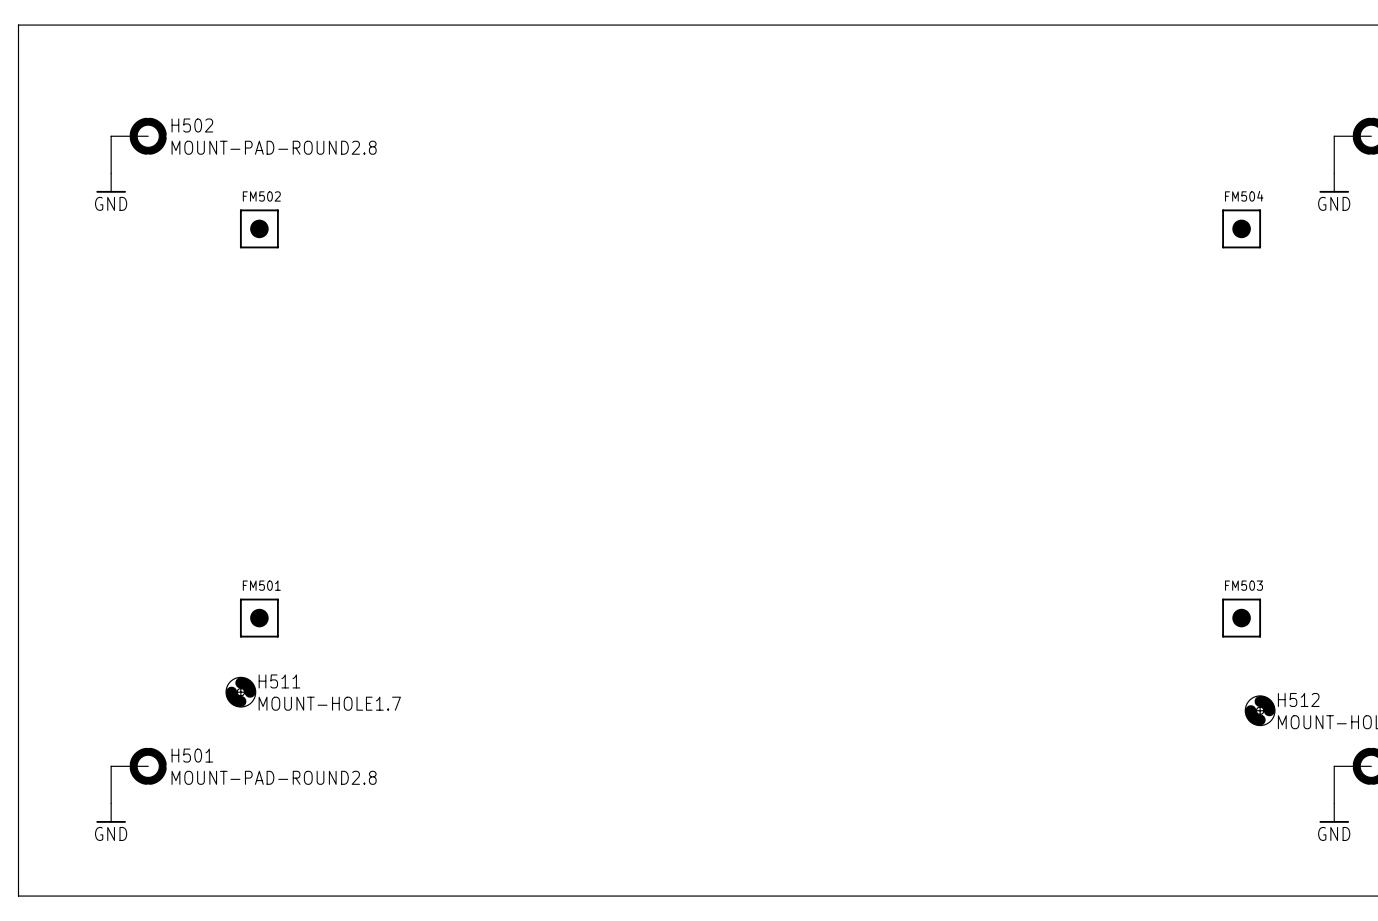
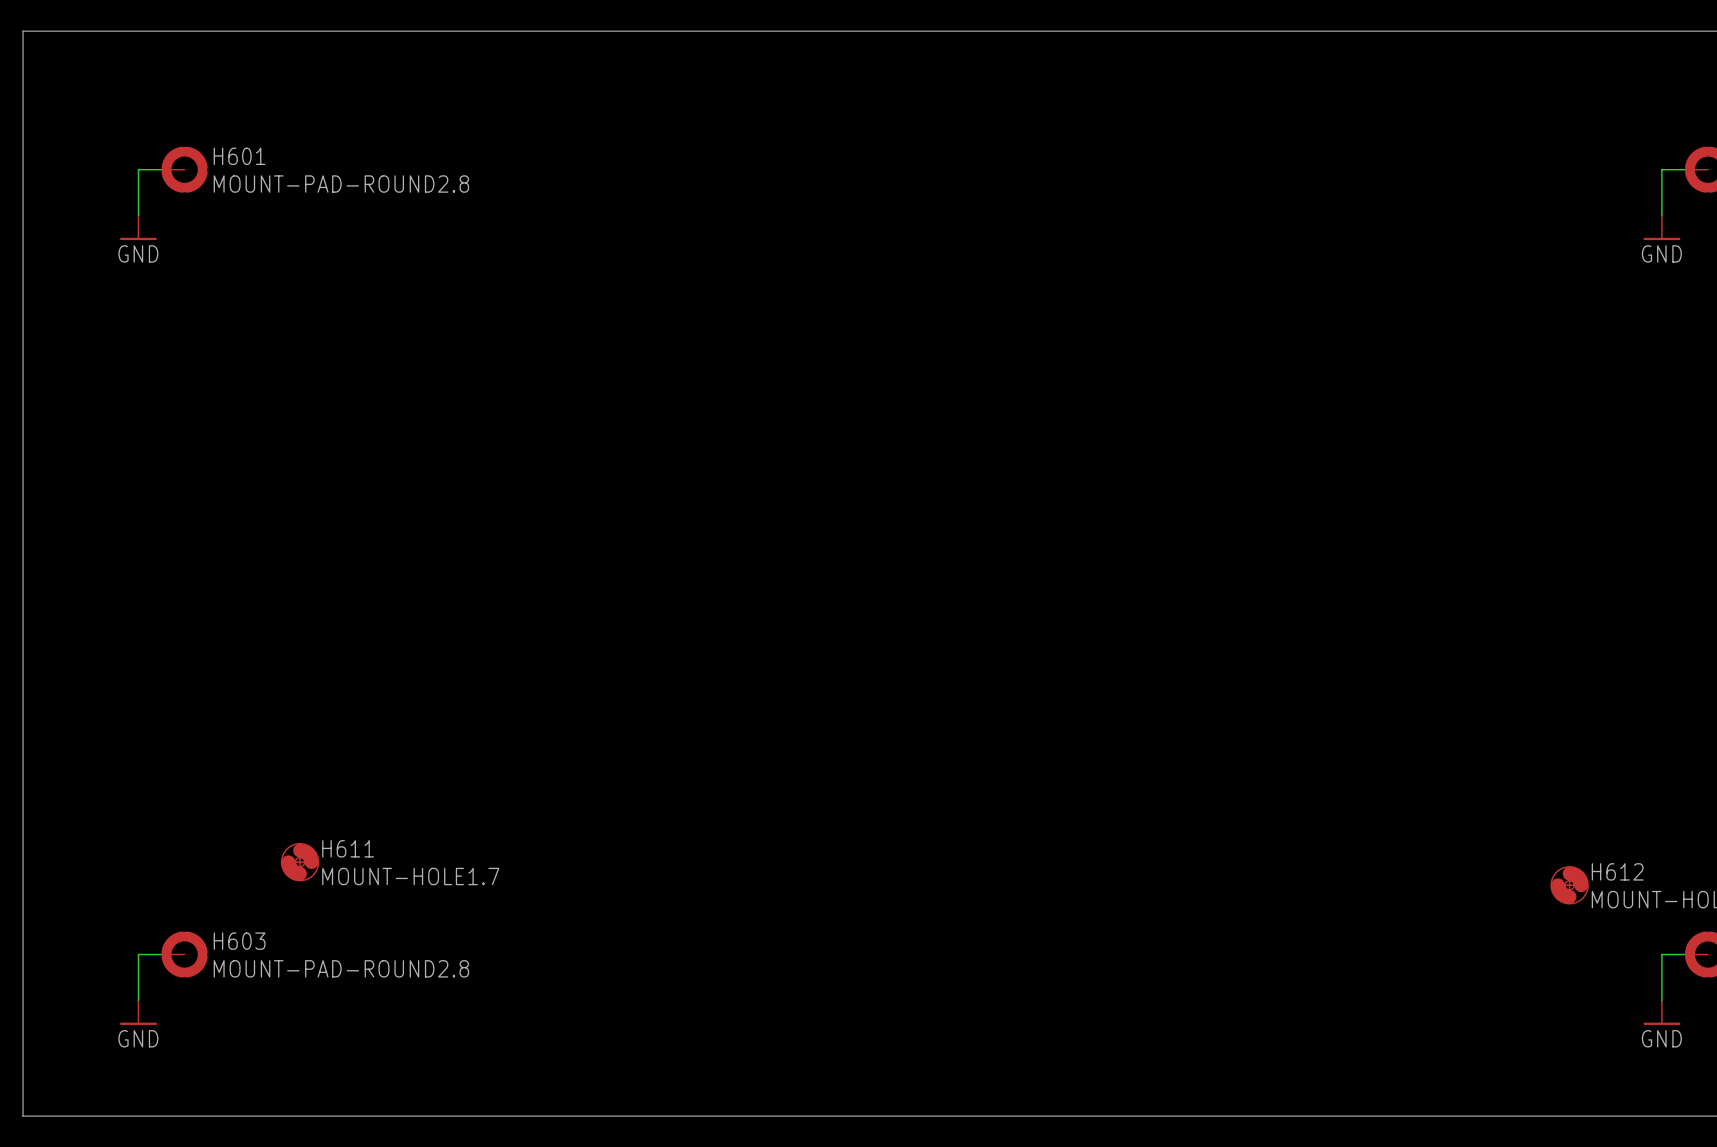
H502 name: H502 (192, 125) -> H601 (239, 156)
FM502: (259, 228) -> none
FM504: (1241, 228) -> none
FM501: (259, 618) -> none
FM503: (1241, 618) -> none
H511 name: H511 (279, 681) -> H611 (348, 848)
H512 name: H512 (1298, 699) -> H612 (1617, 871)
H501 name: H501 (192, 755) -> H603 (239, 941)

